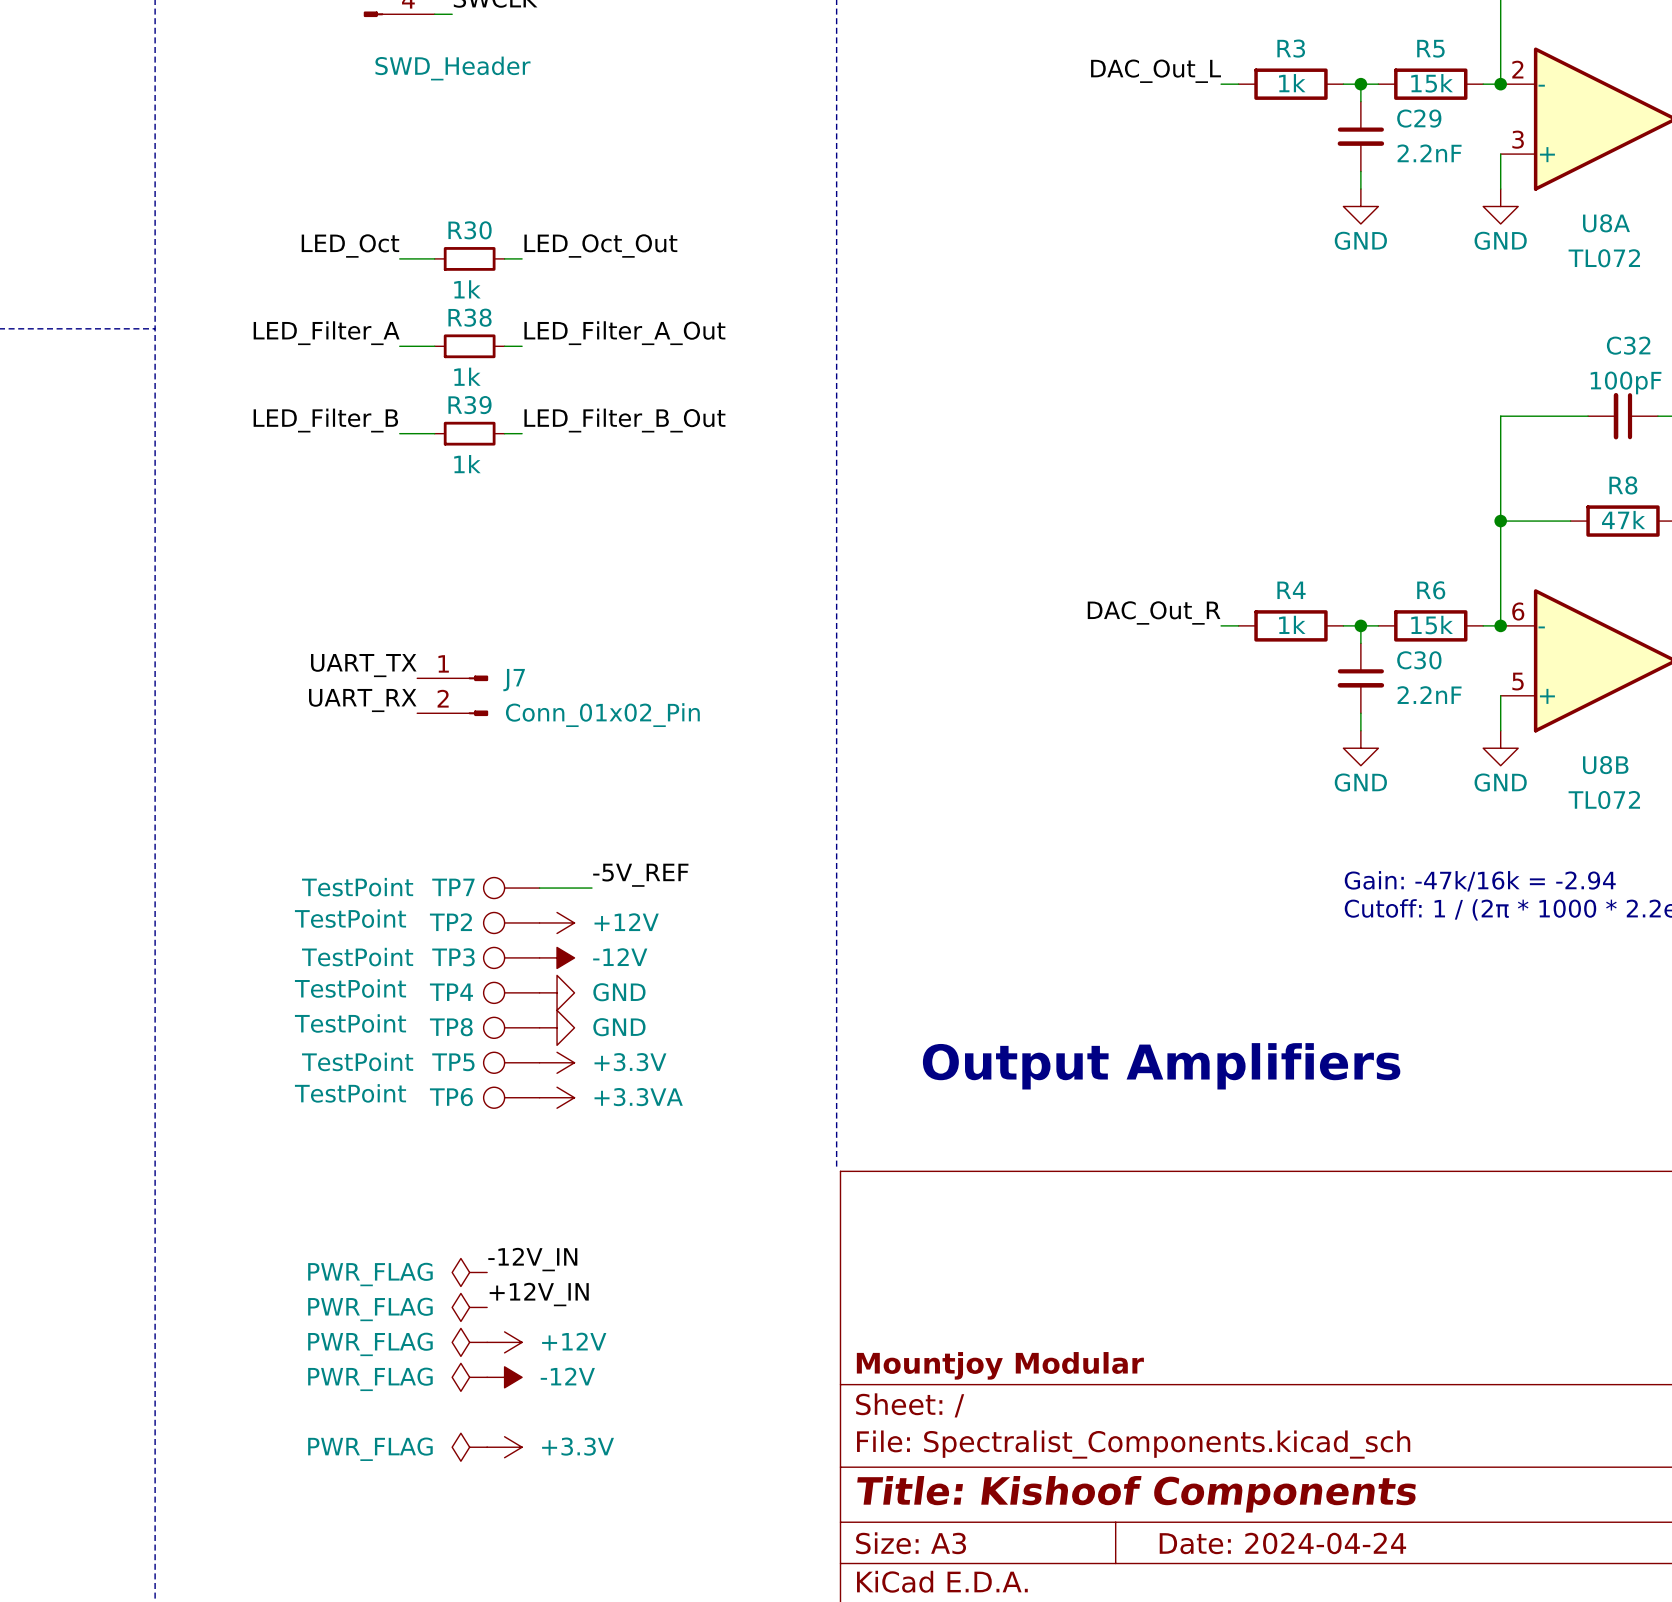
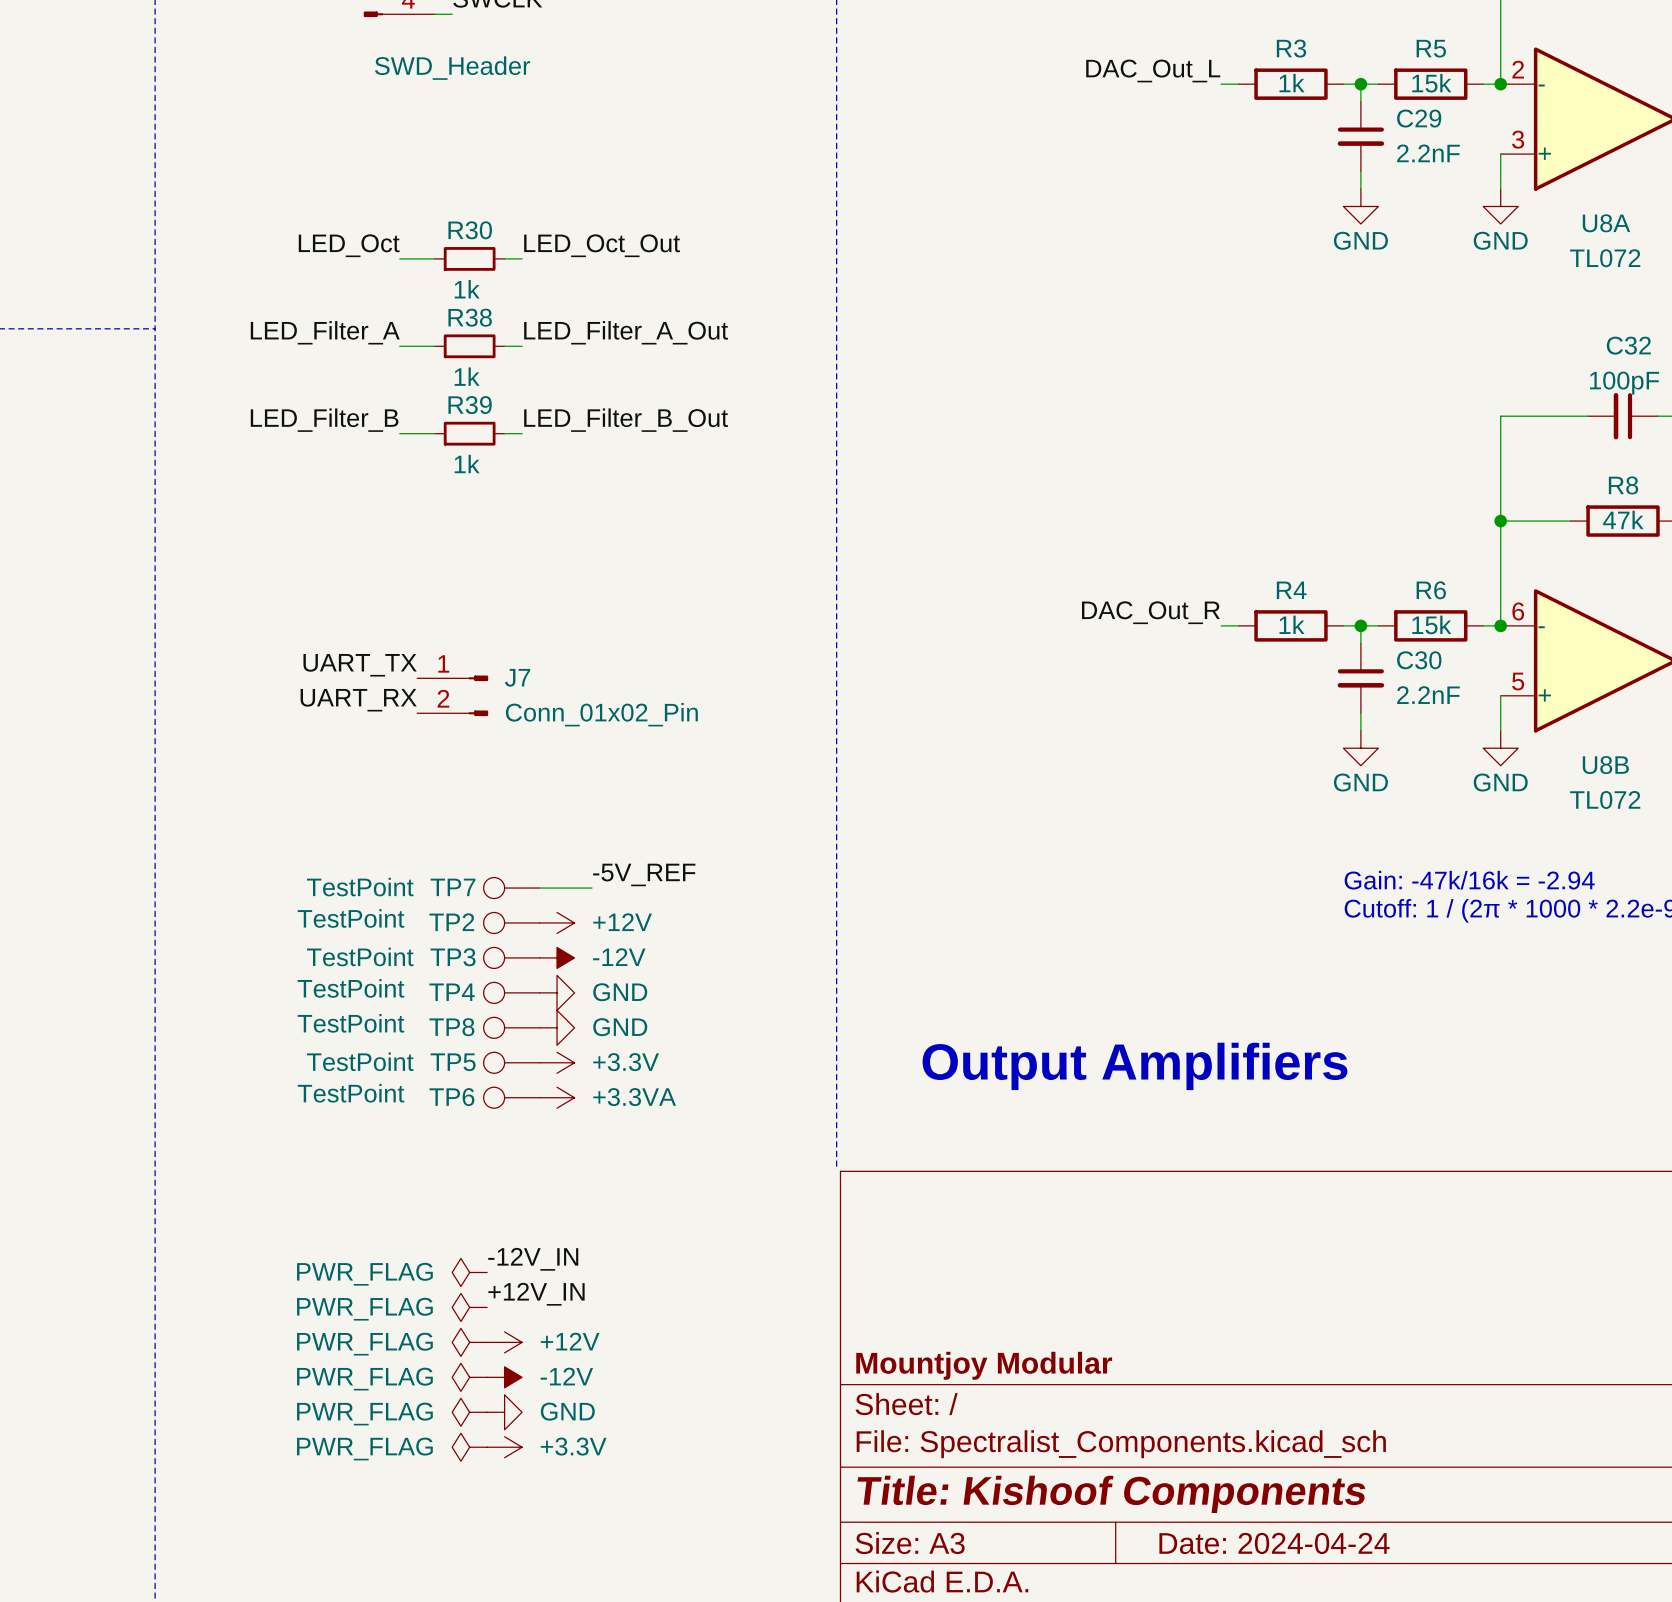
power symbol: none -> PWR_FLAG (469, 1412)
power symbol: none -> GND (504, 1412)

